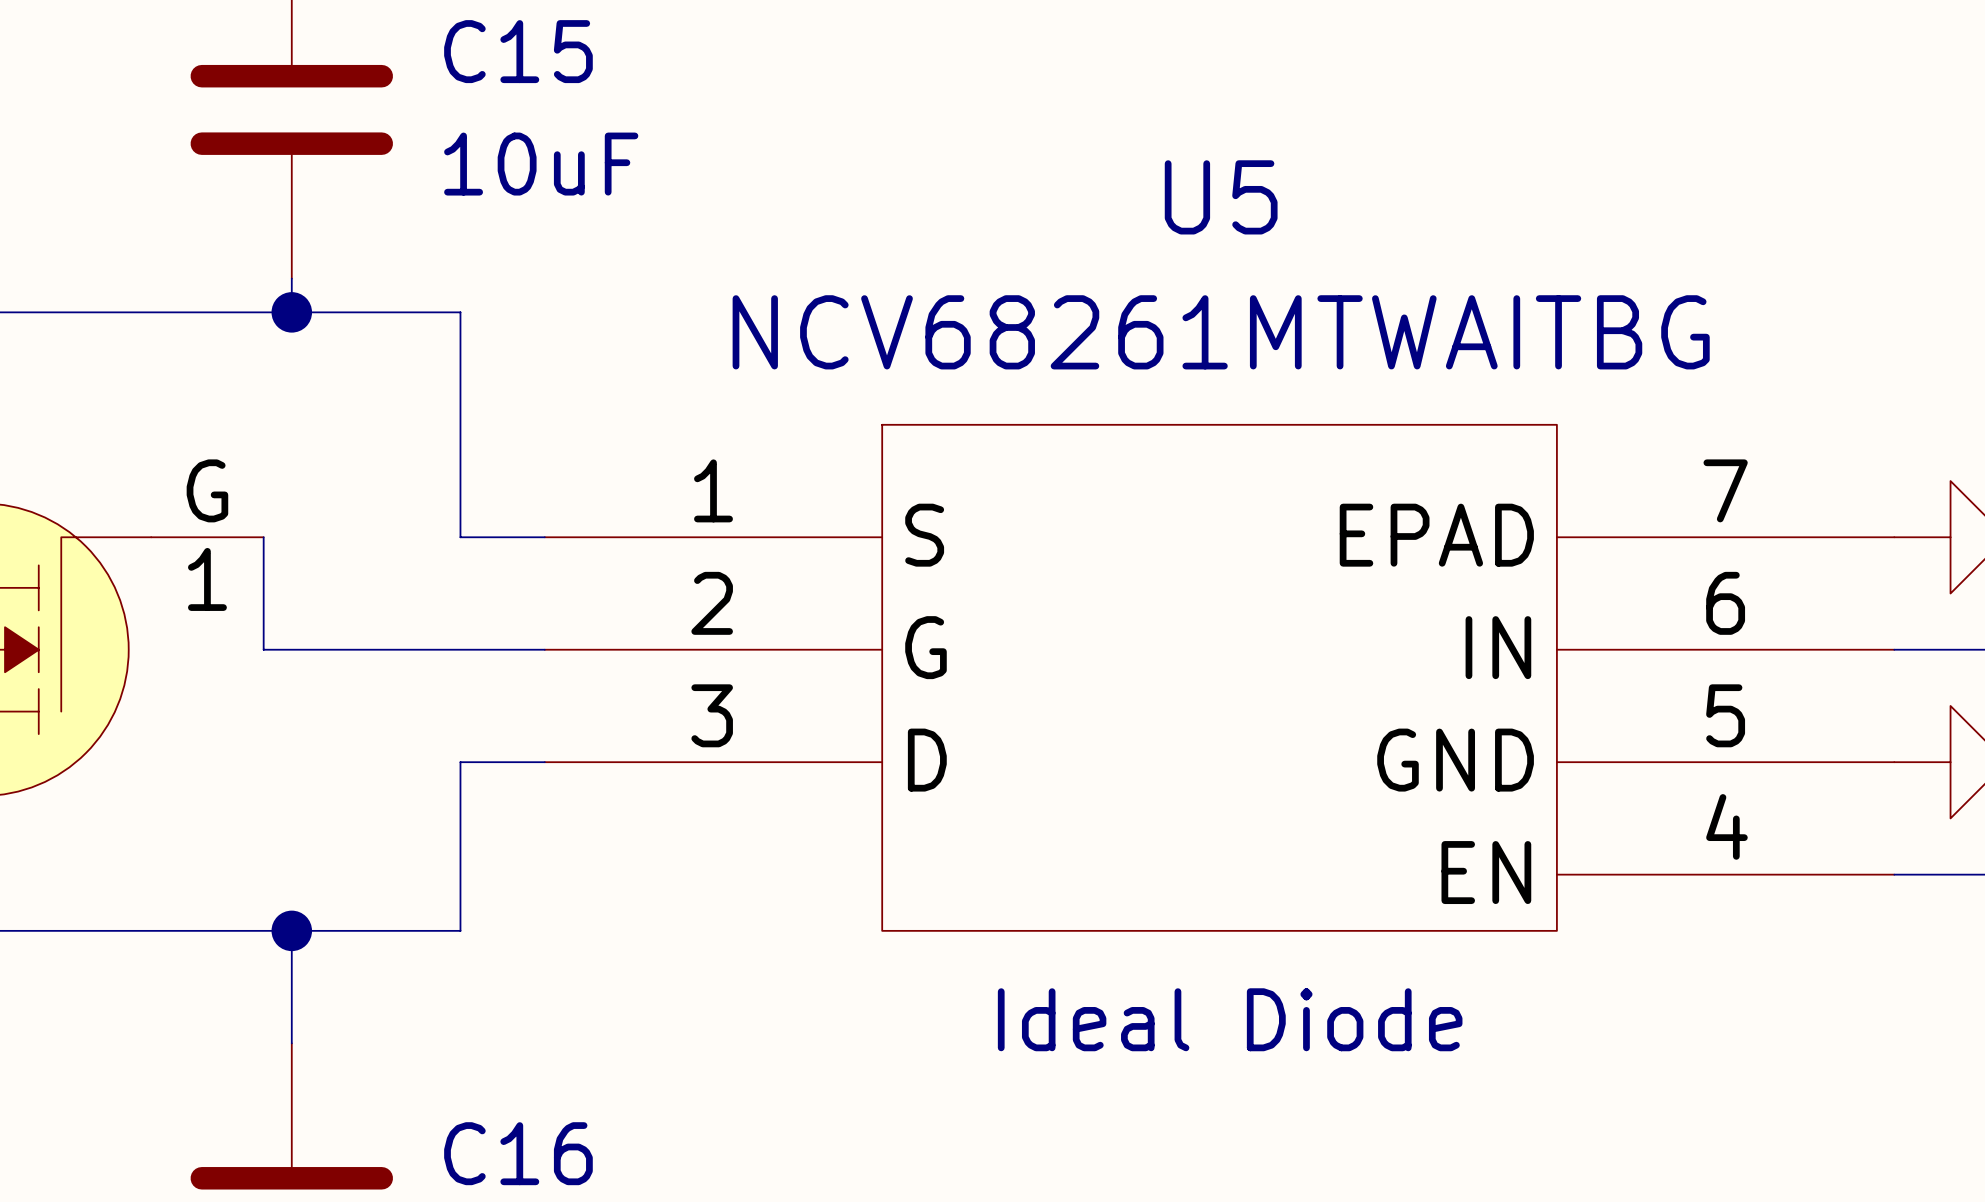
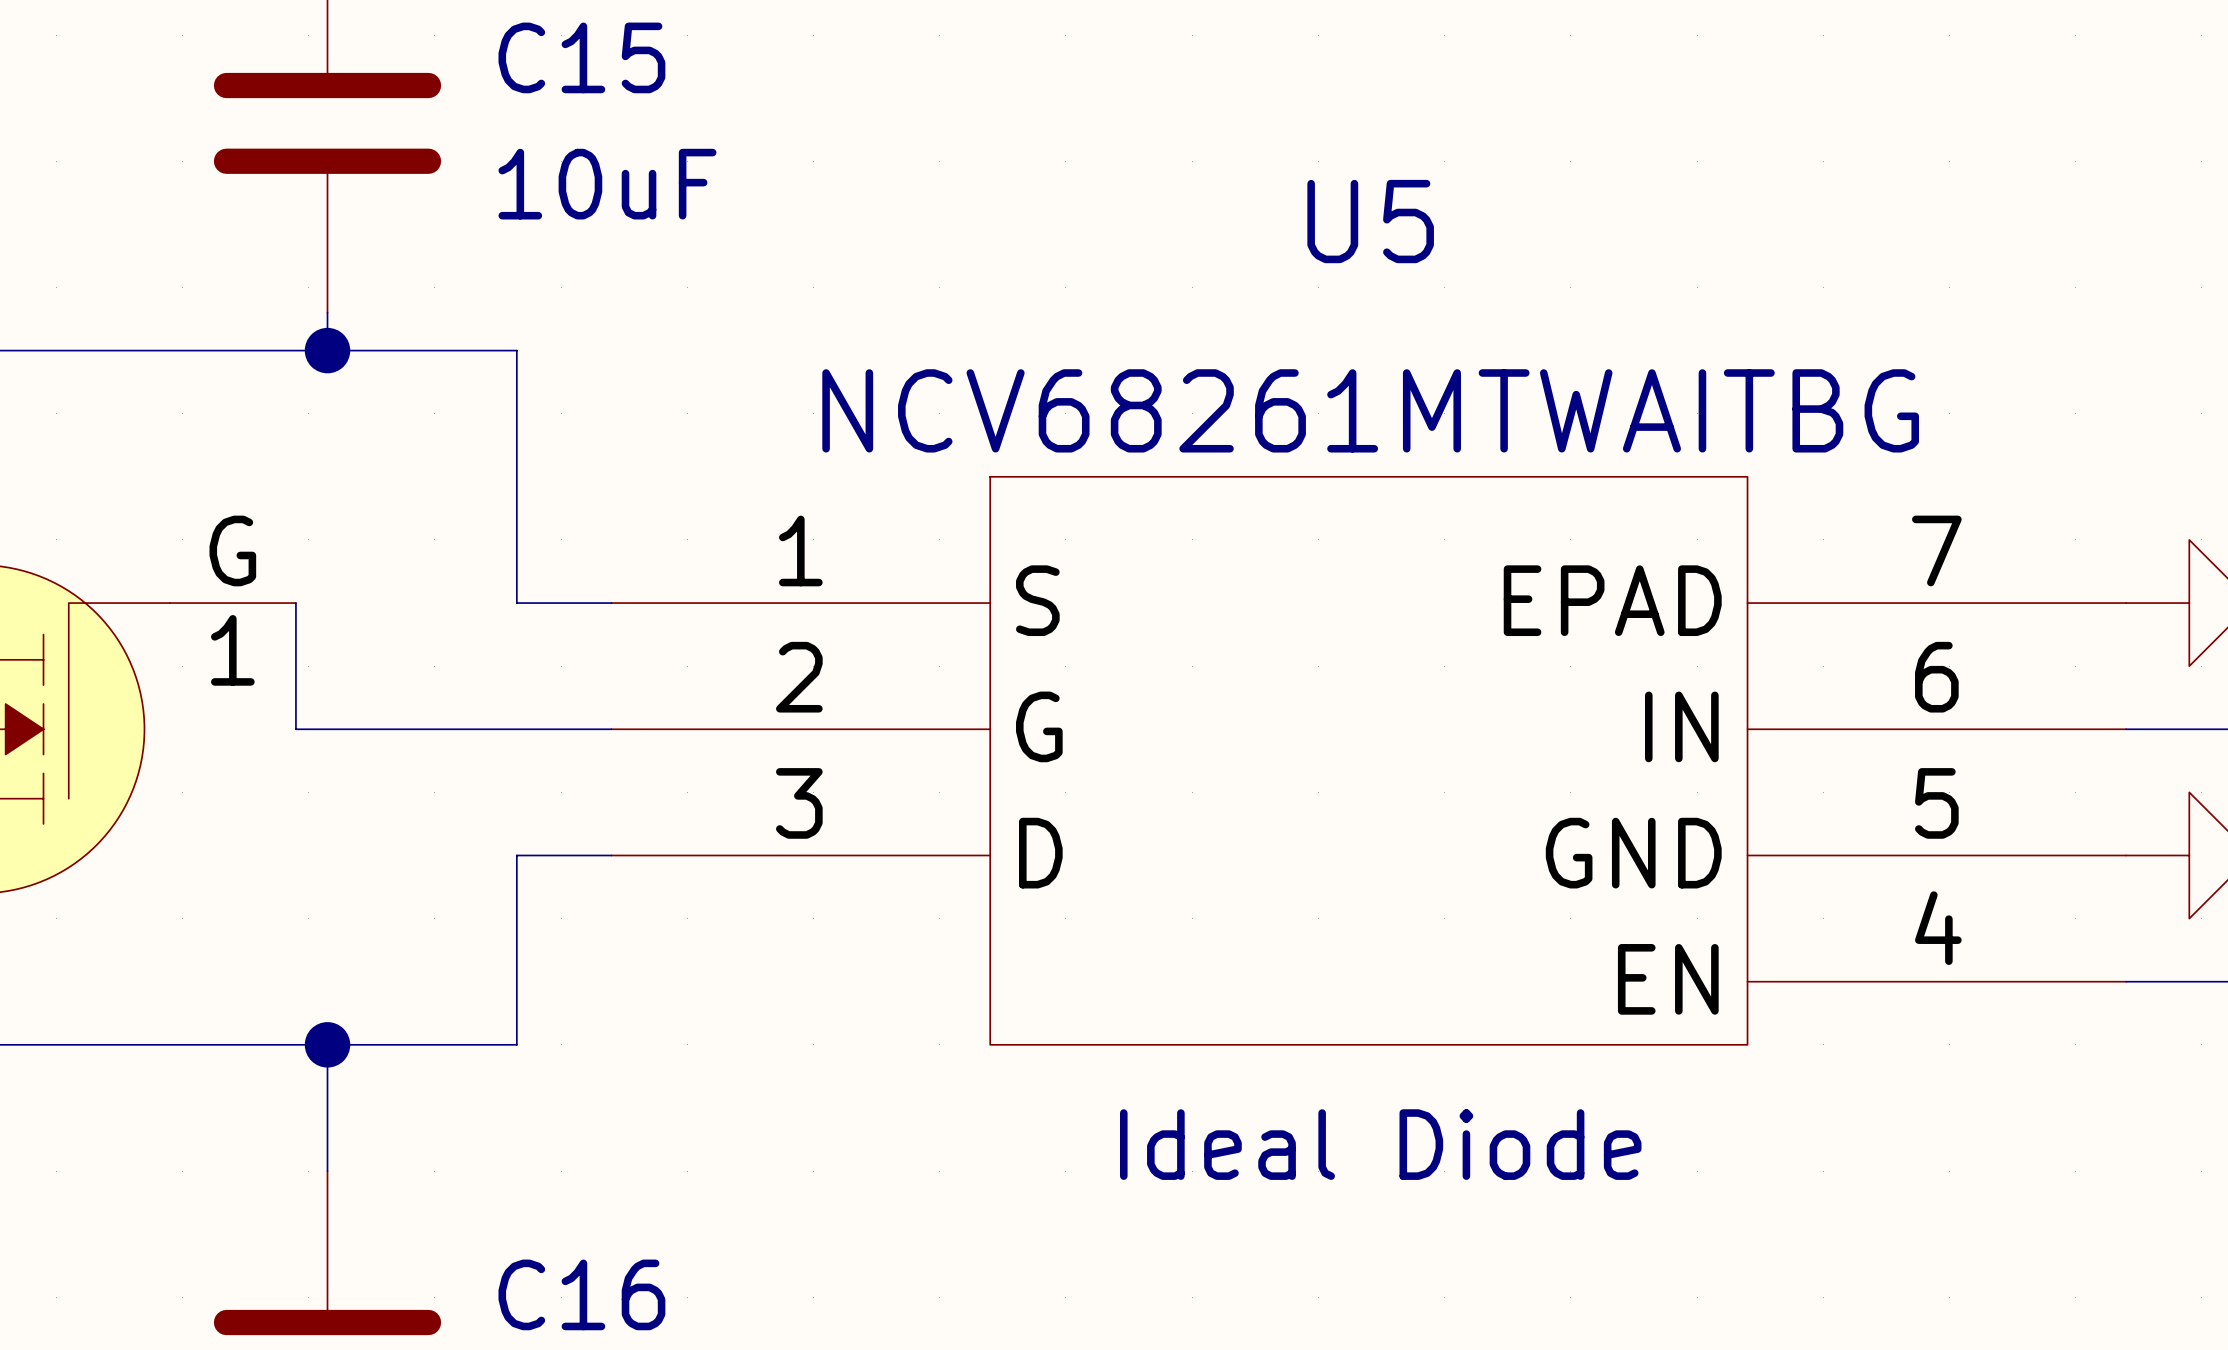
U5 value position: NCV68261MTWAITBG (1221, 332) -> NCV68261MTWAITBG (1370, 410)

